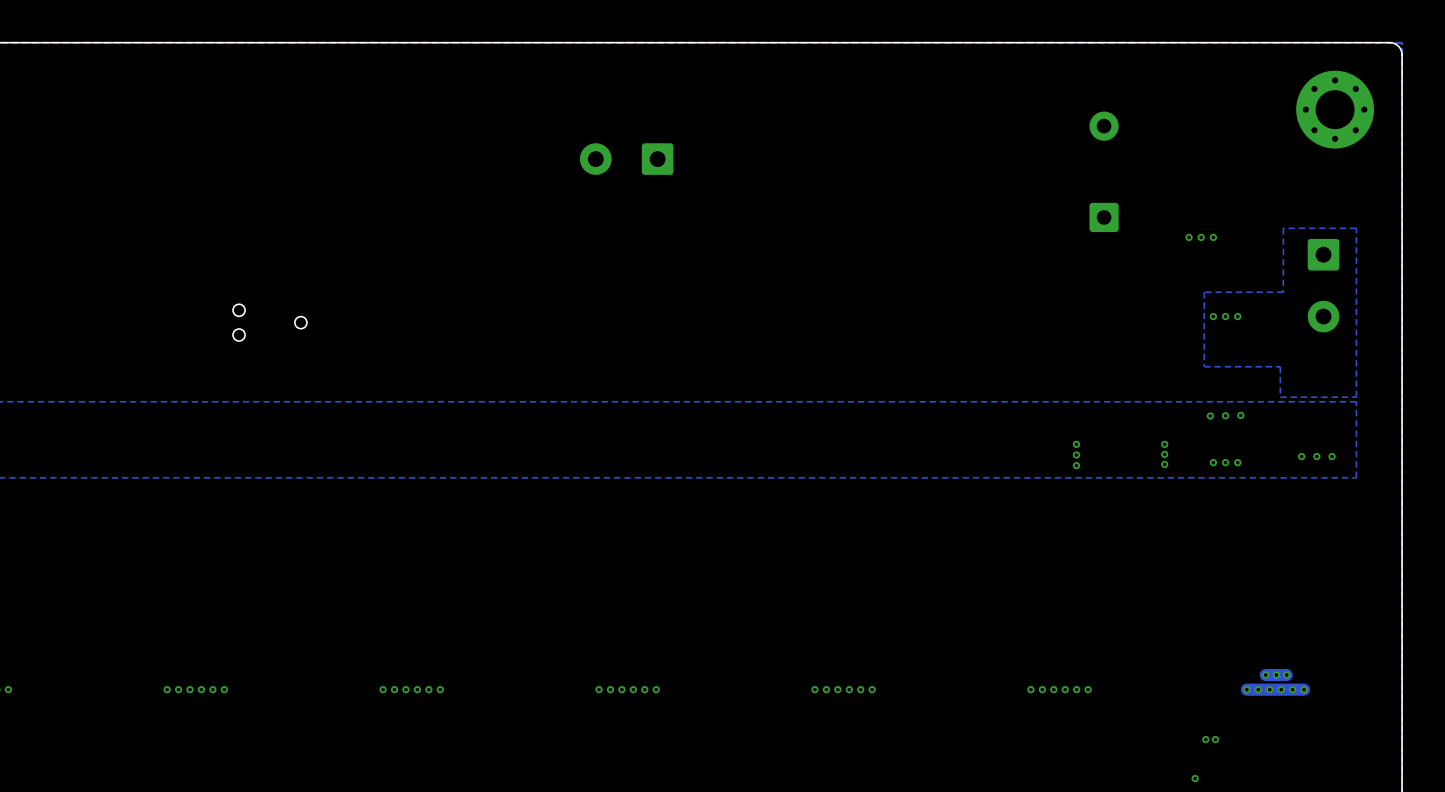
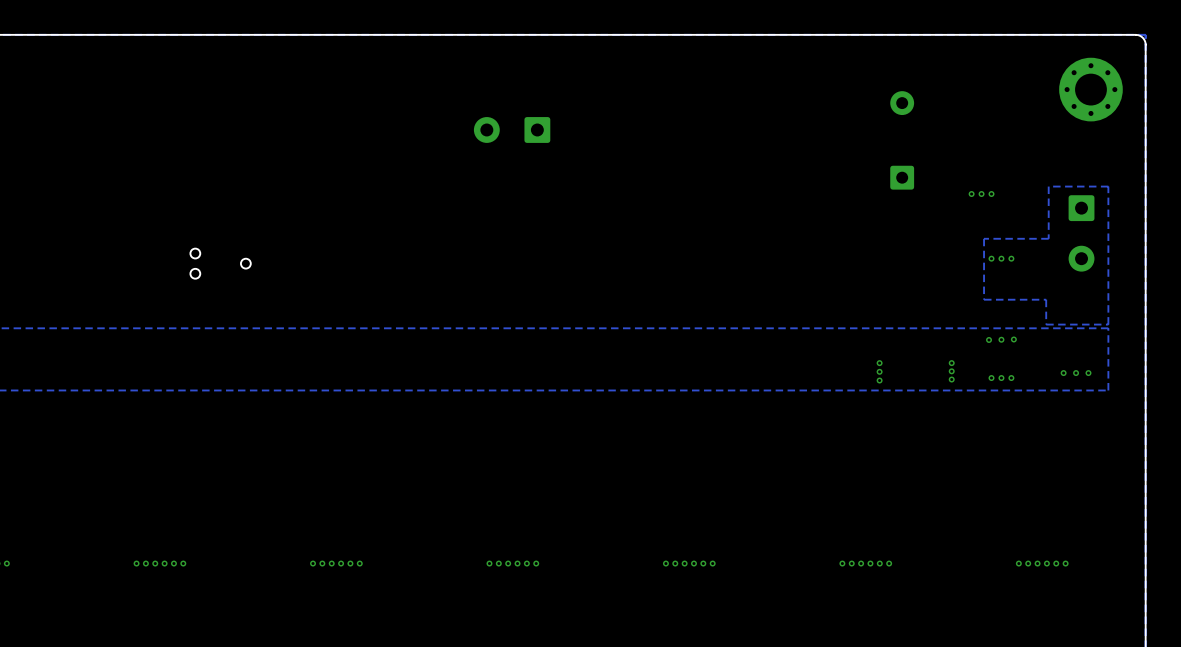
via: (1265, 675) -> none
via: (1276, 675) -> none
track: (1286, 675) (1265, 675) -> none
via: (1286, 675) -> none
track: (1304, 689) (1246, 689) -> none
via: (1205, 739) -> none
via: (1215, 739) -> none
via: (1195, 778) -> none

